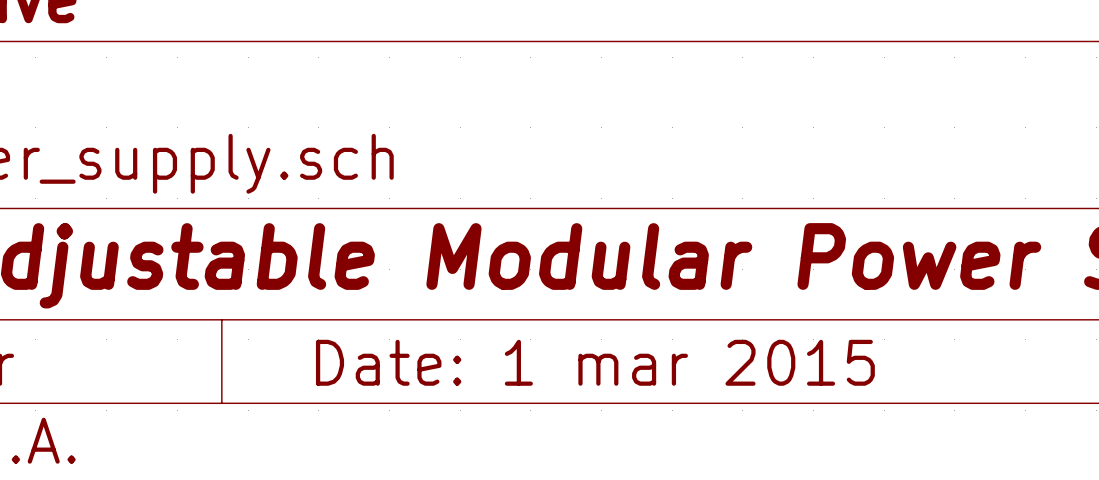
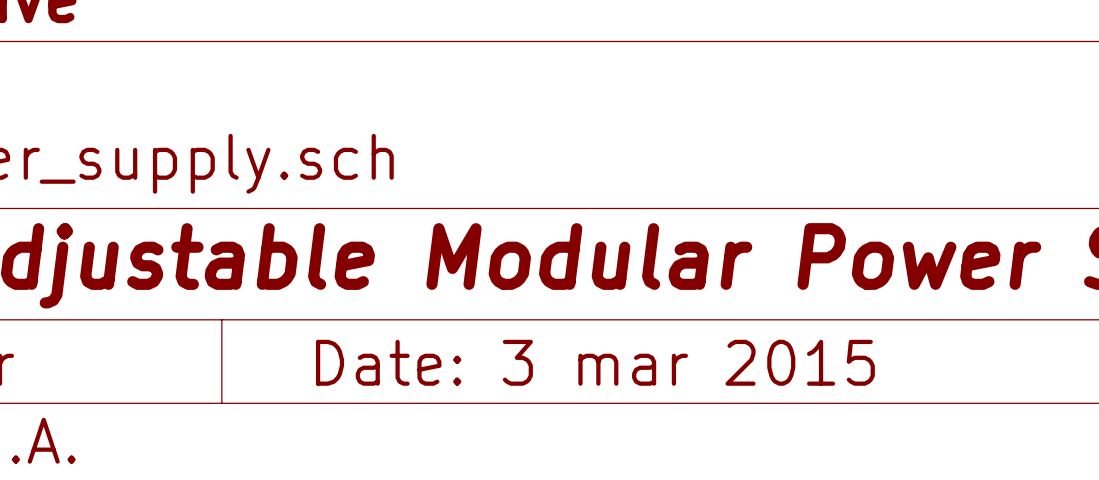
title block: Date: 1 mar 2015 (595, 362) -> Date: 3 mar 2015 (595, 362)

